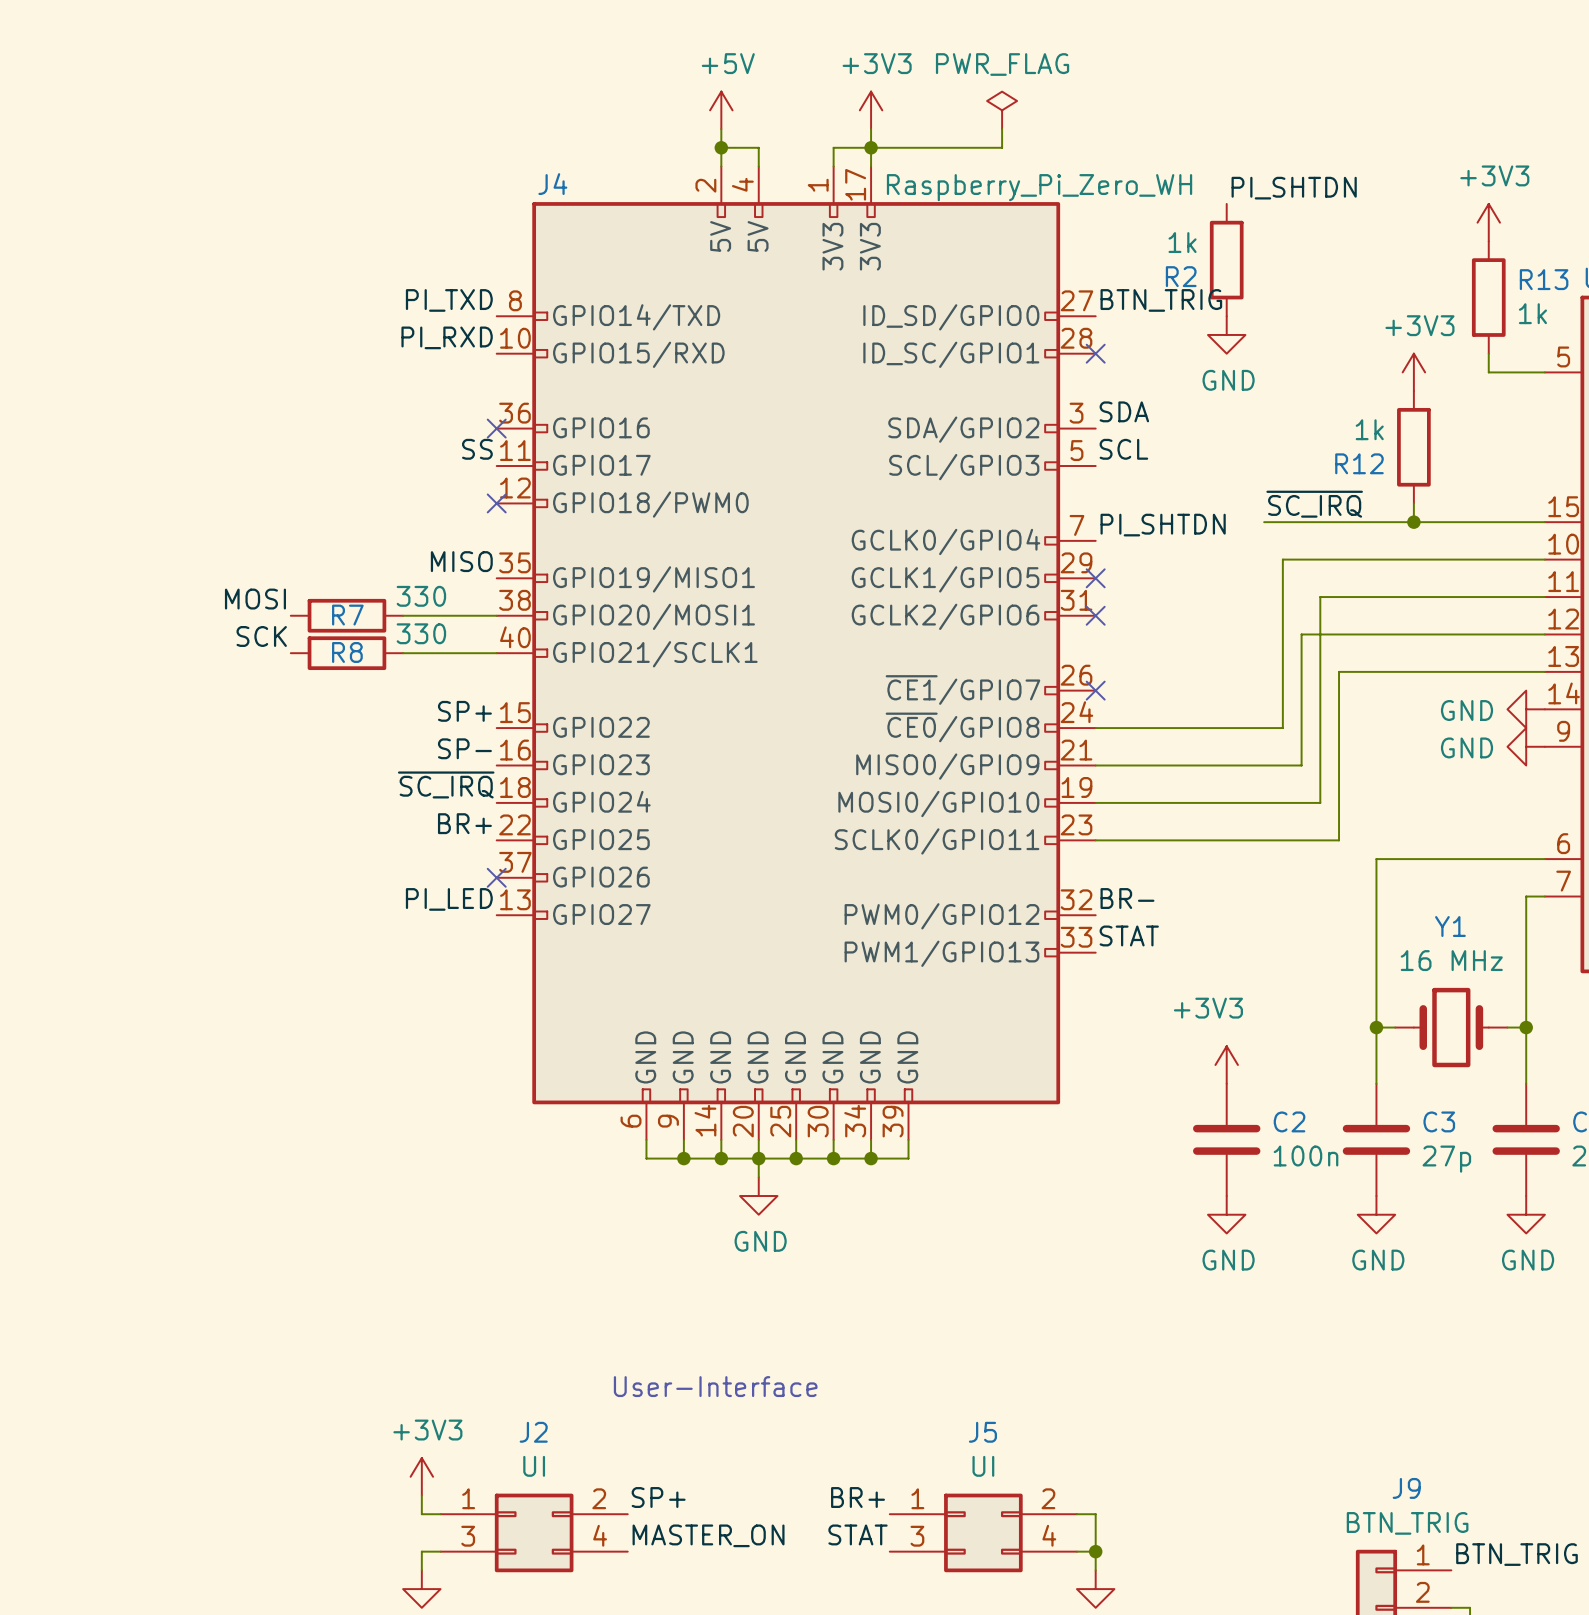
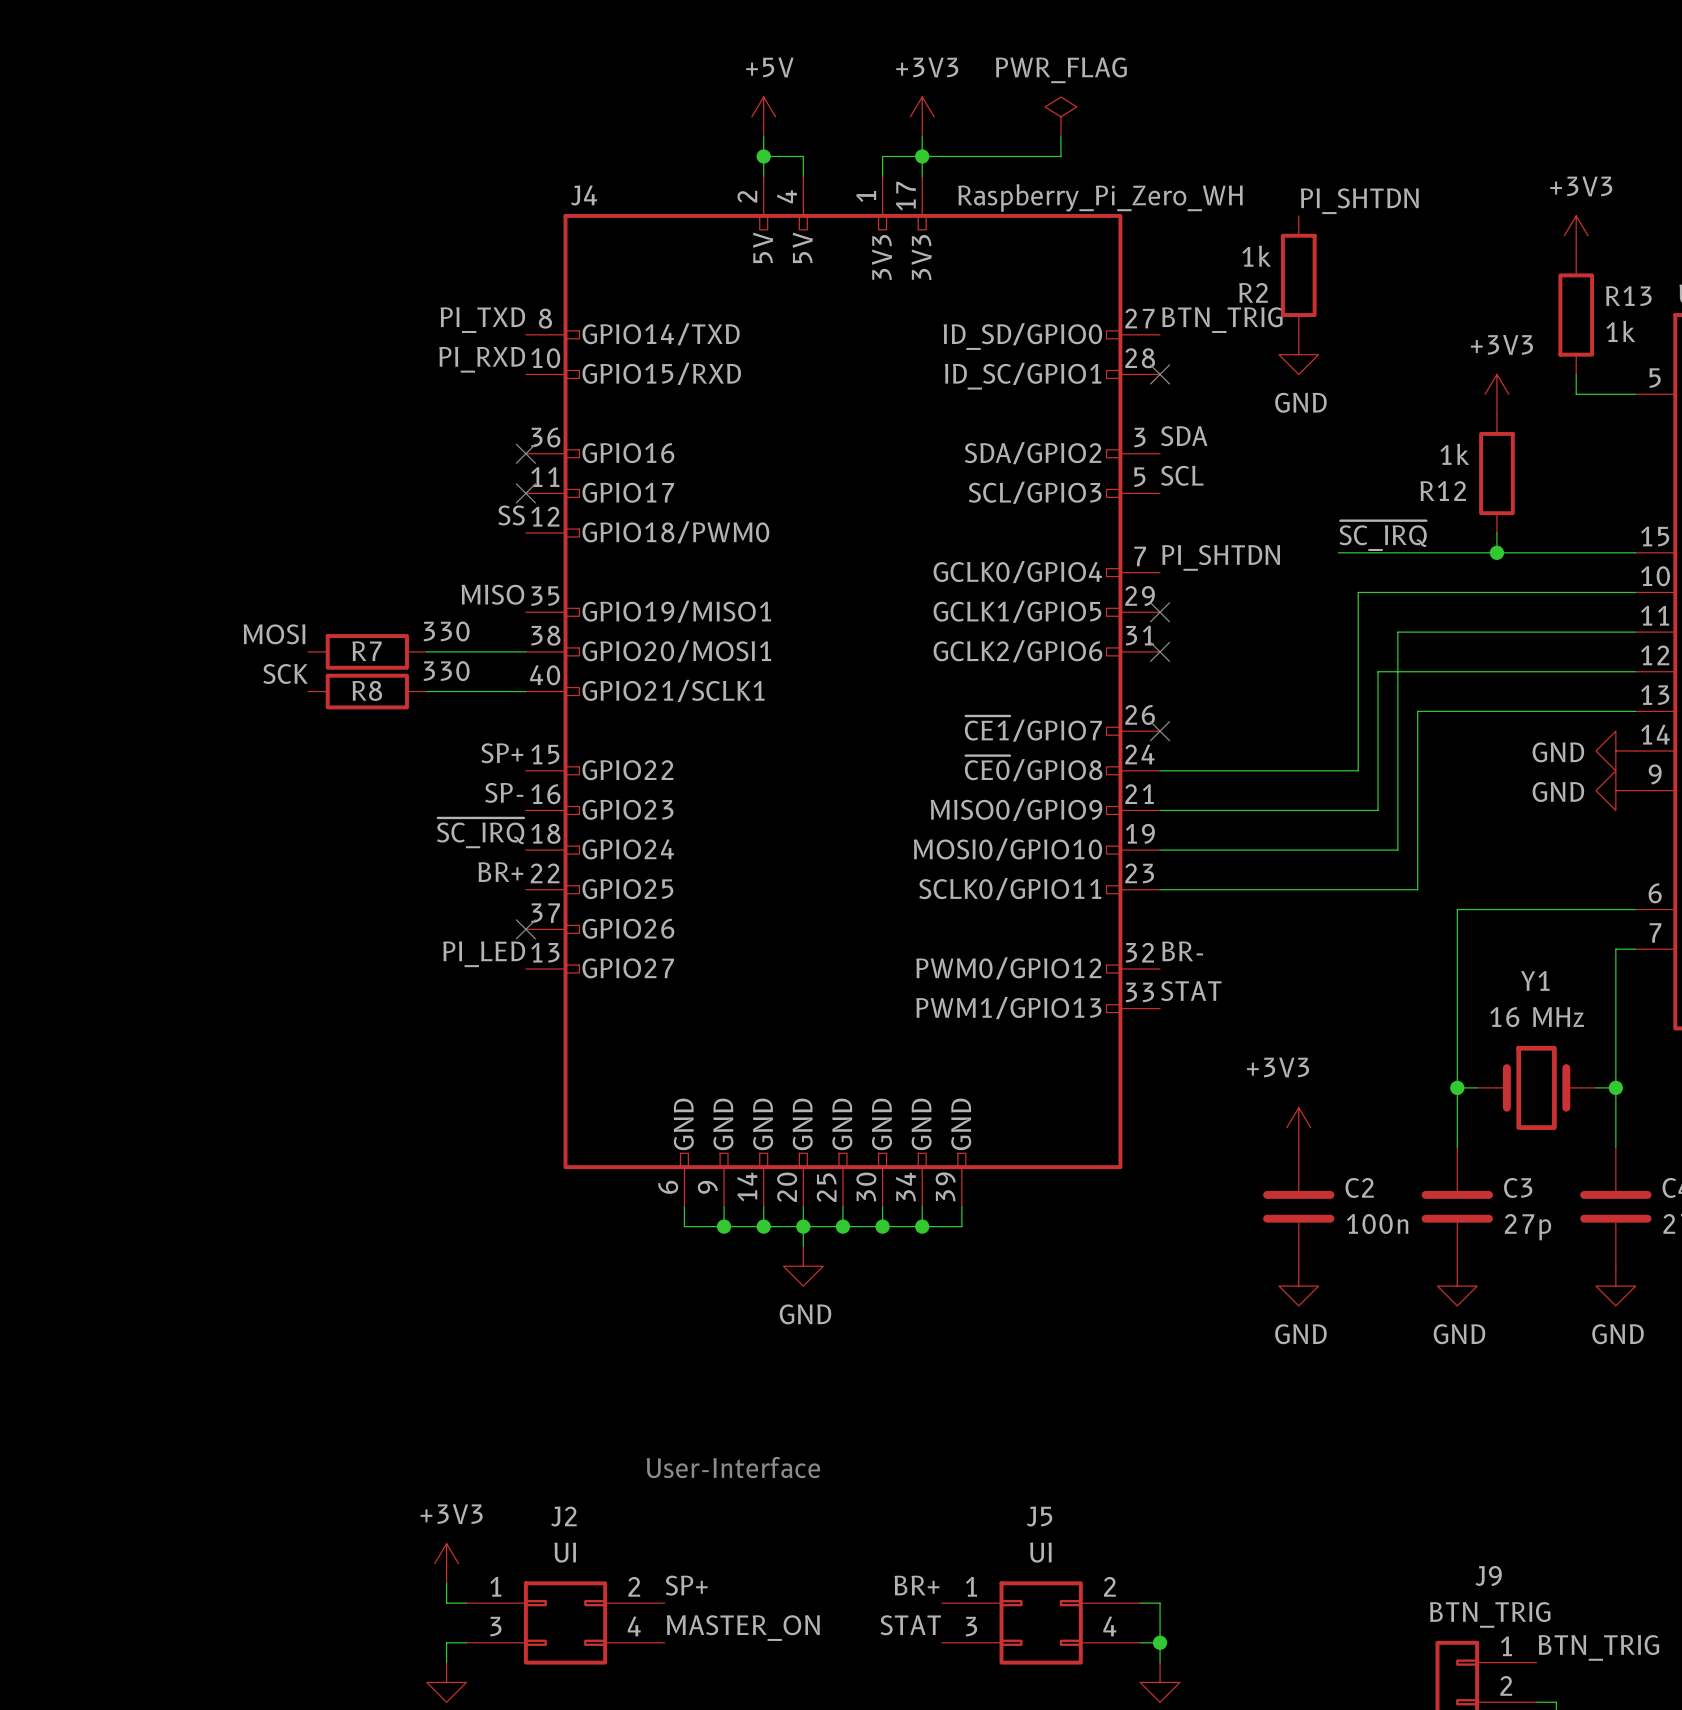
label position: SS (477, 449) -> SS (511, 515)
no-connect mark position: (496, 503) -> (525, 493)

